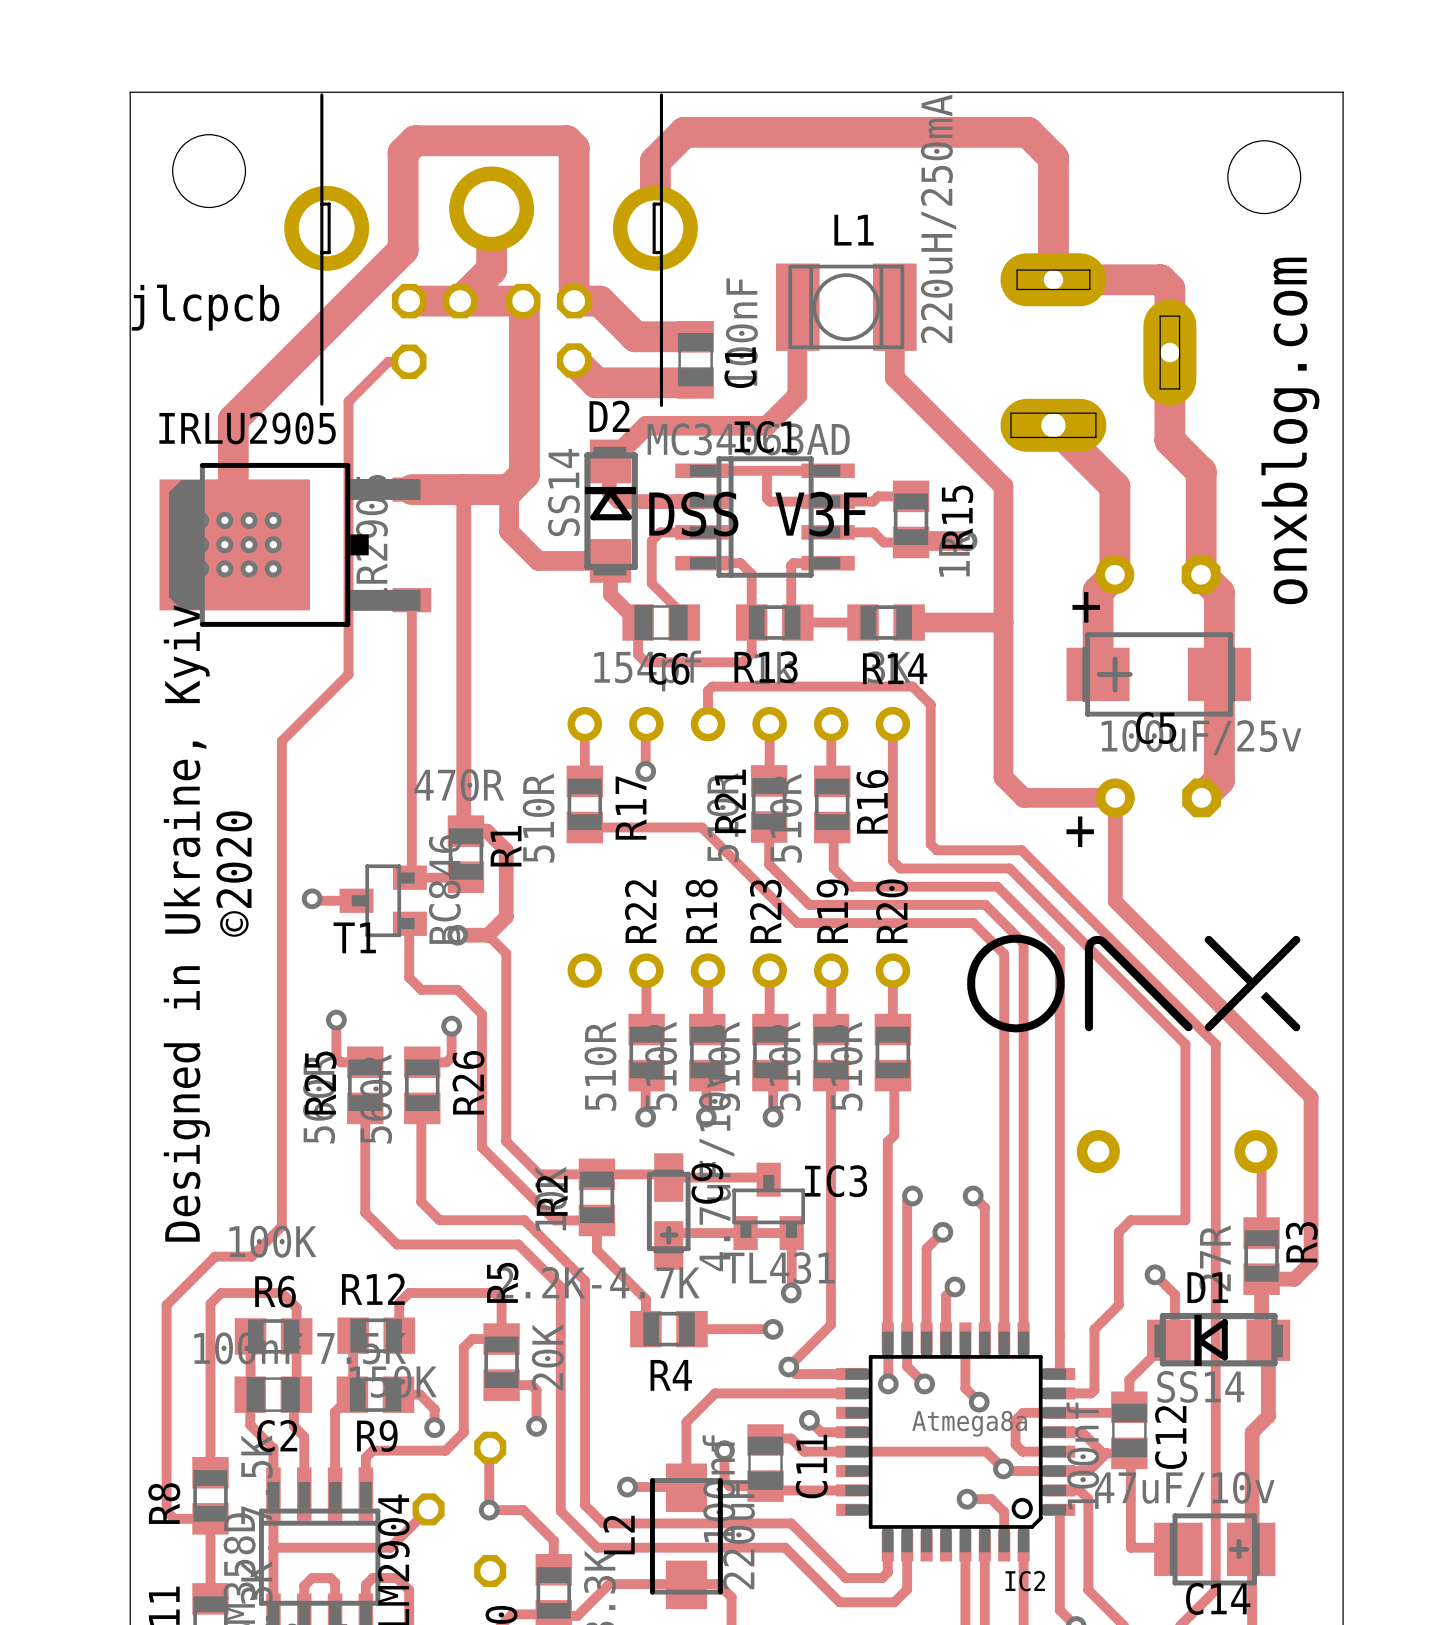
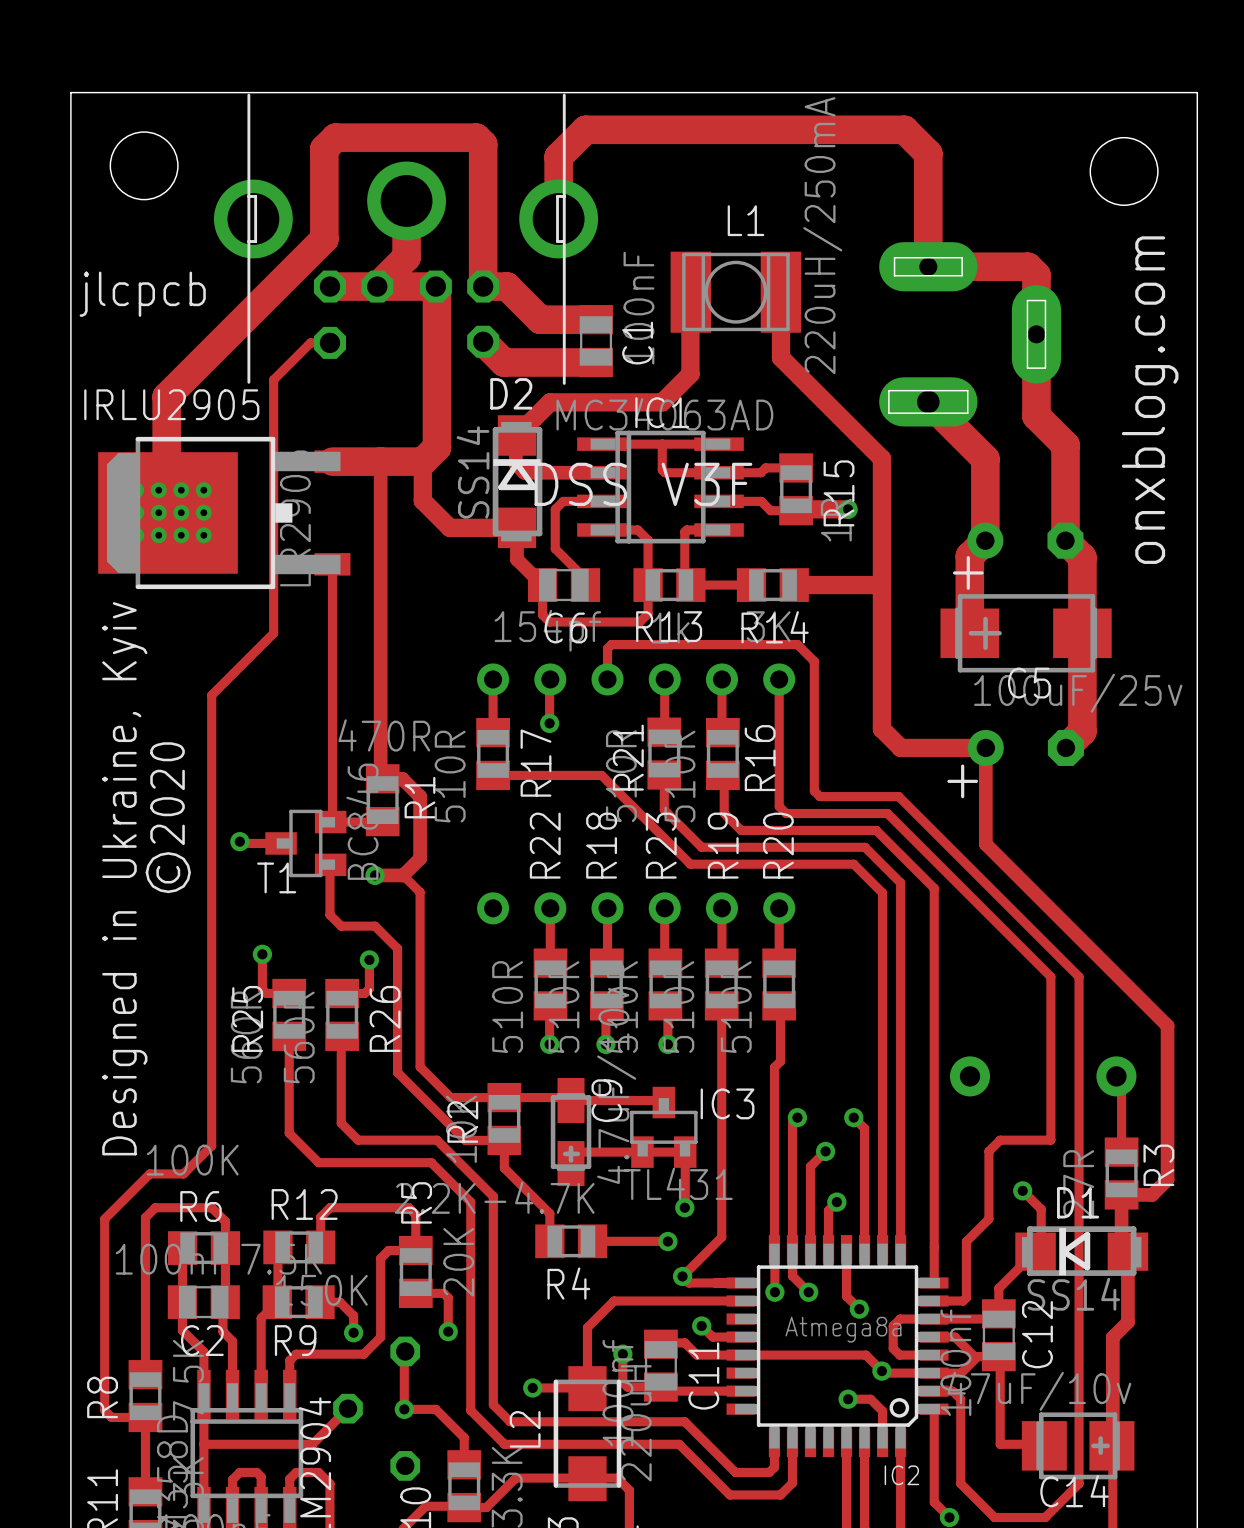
drawing: [967, 934, 1301, 1033] -> none

